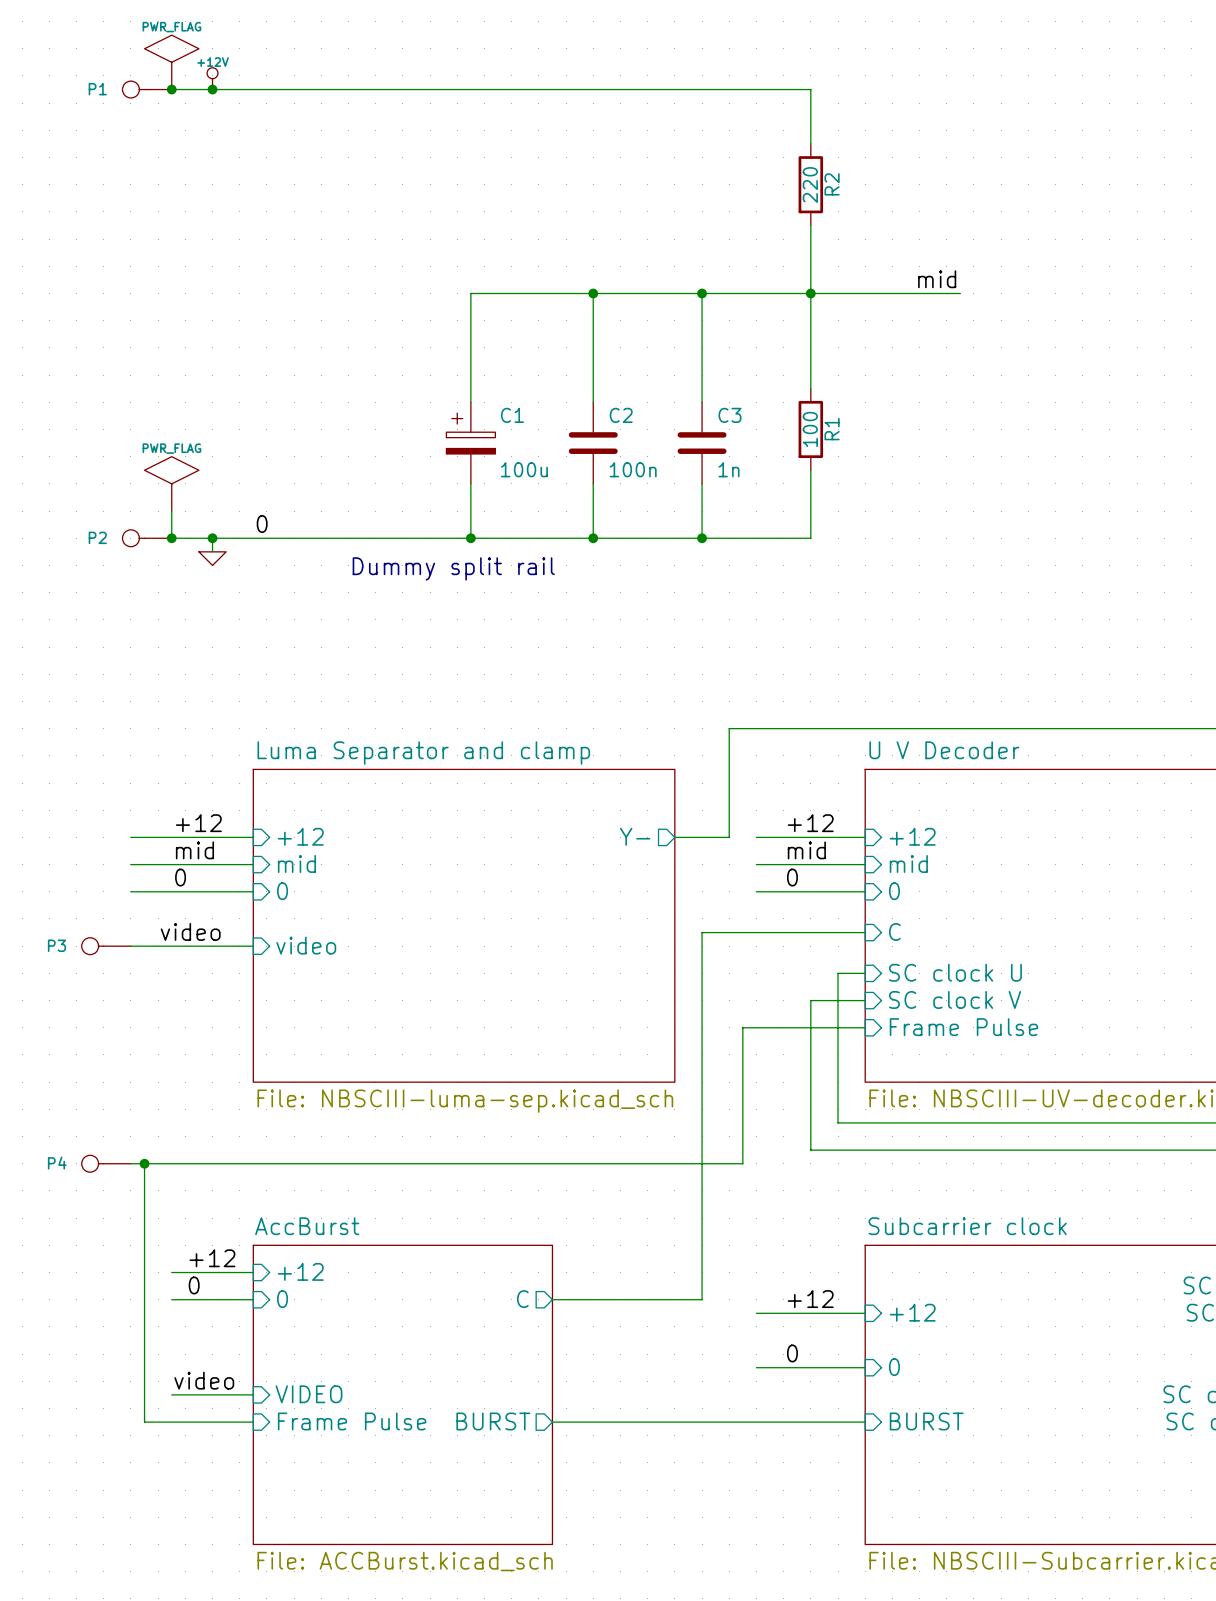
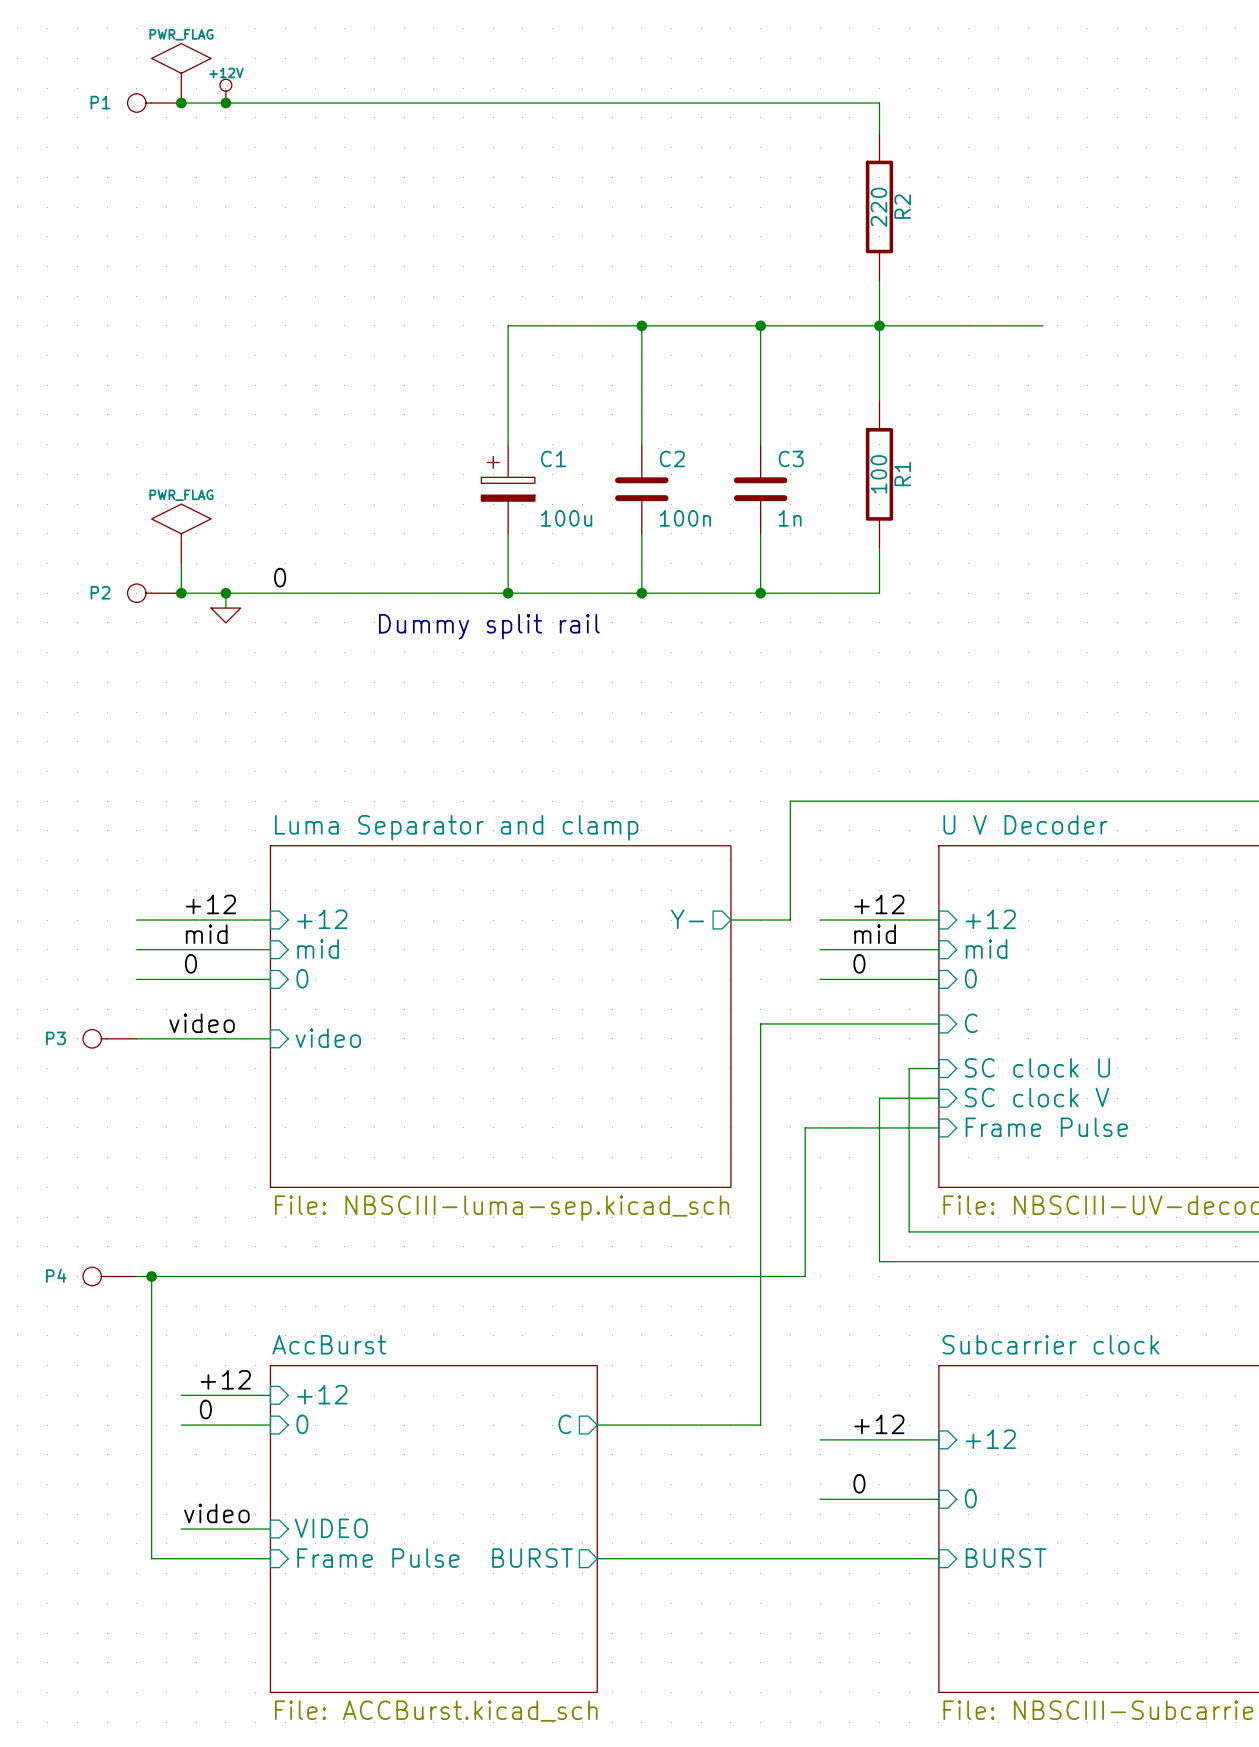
R2 symbol: [798, 143, 824, 226] -> [865, 132, 894, 282]
label: mid (937, 279) -> none
R1 symbol: [798, 388, 824, 471] -> [865, 400, 894, 549]

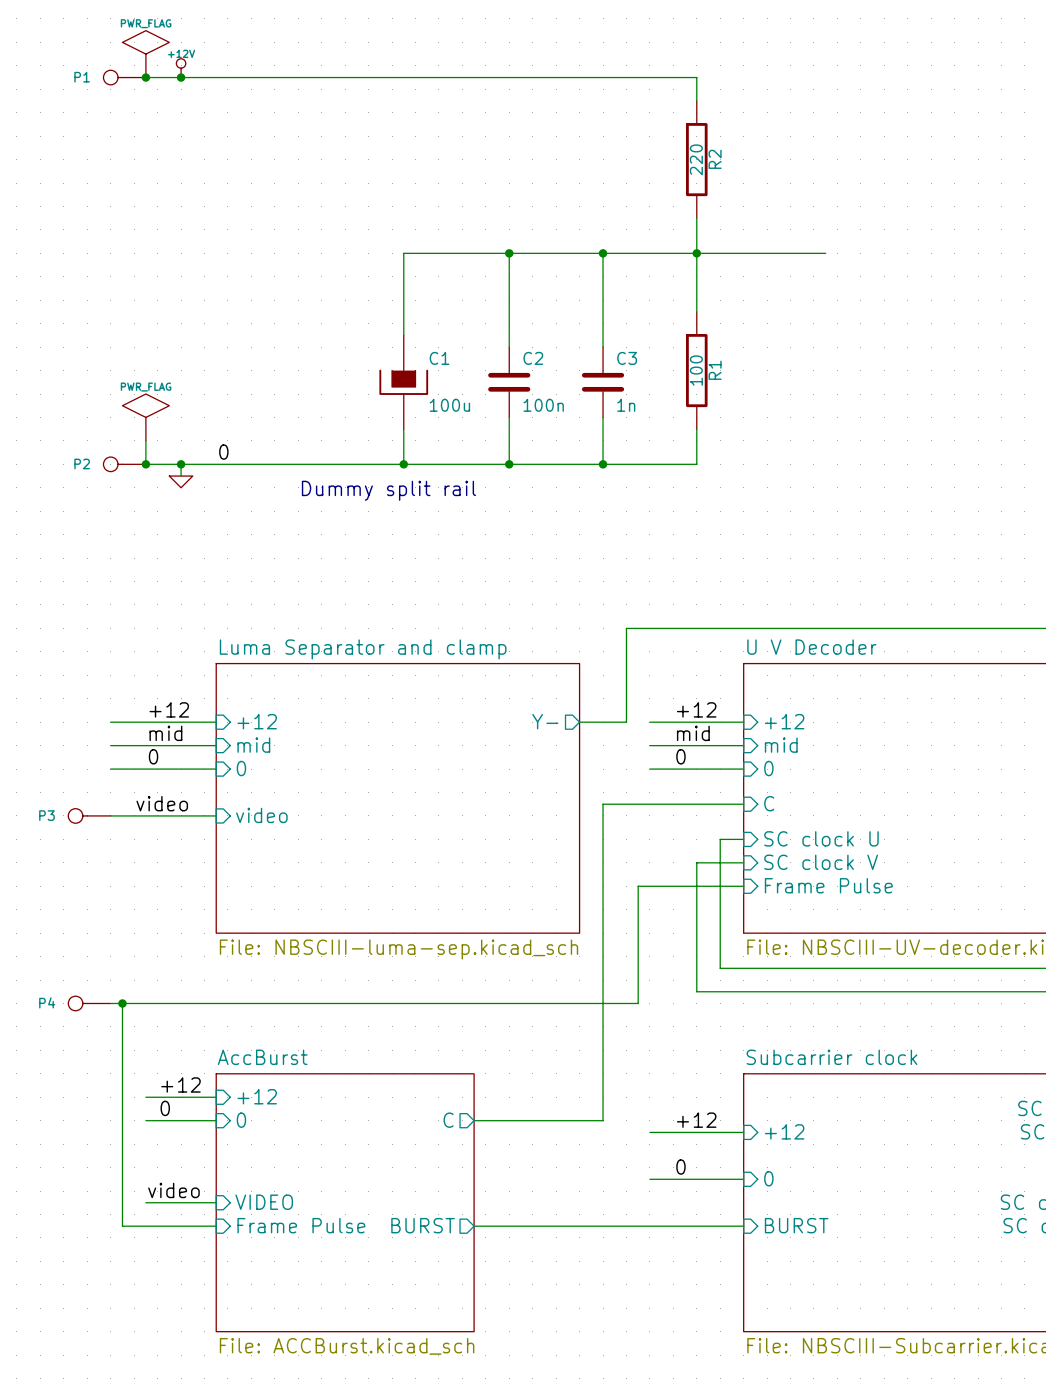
C1 symbol: [481, 444, 535, 534] -> [379, 335, 429, 430]

